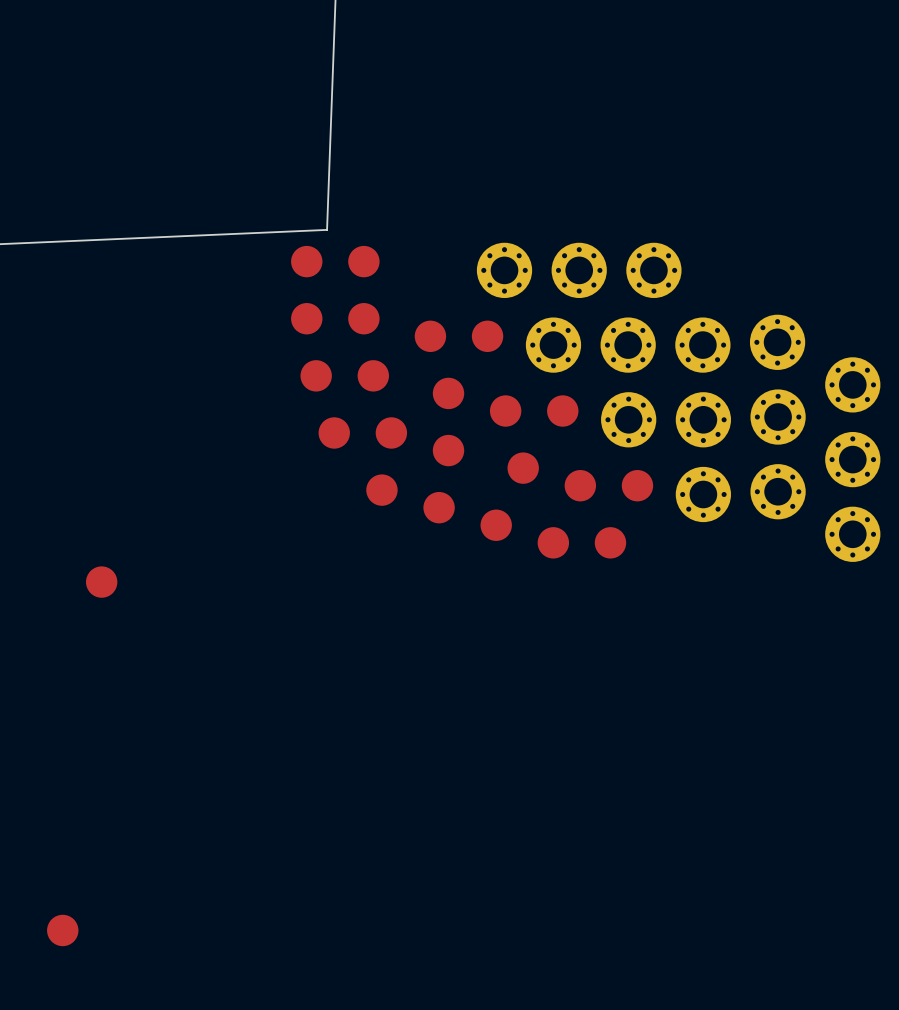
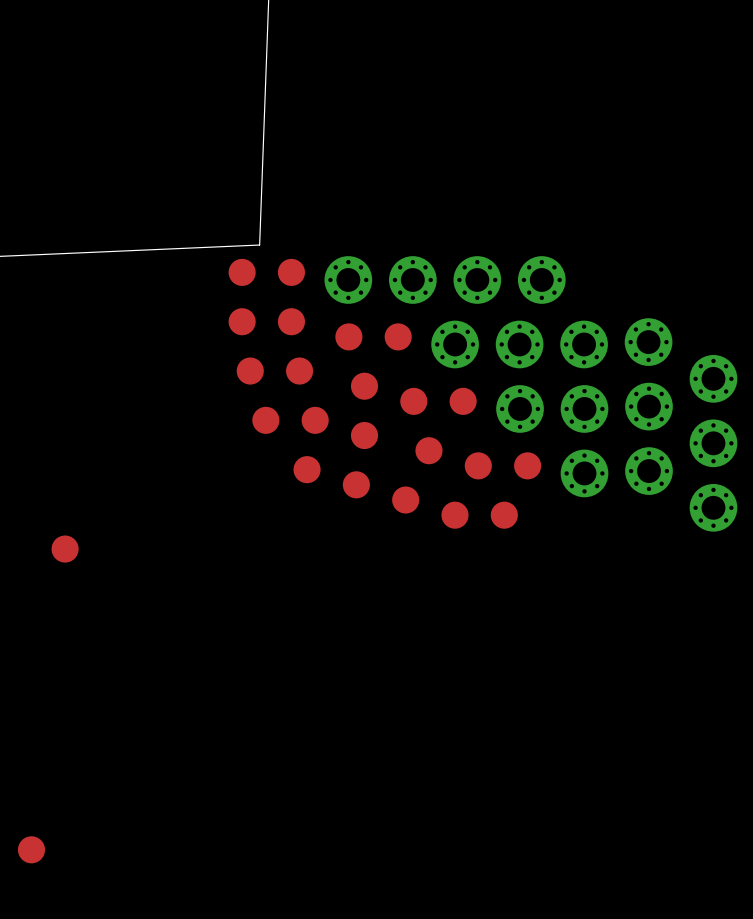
part: none -> (348, 279)

